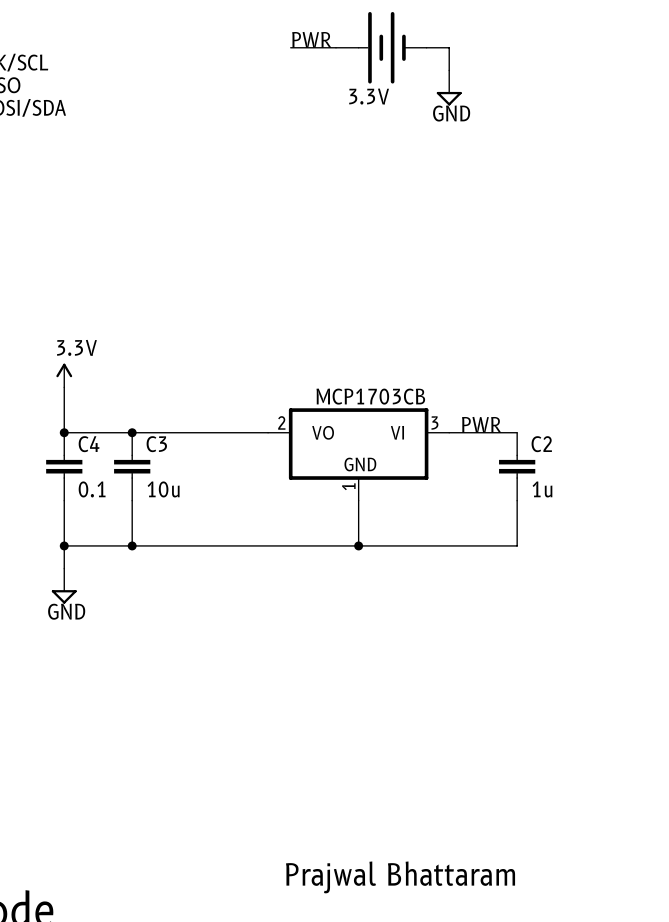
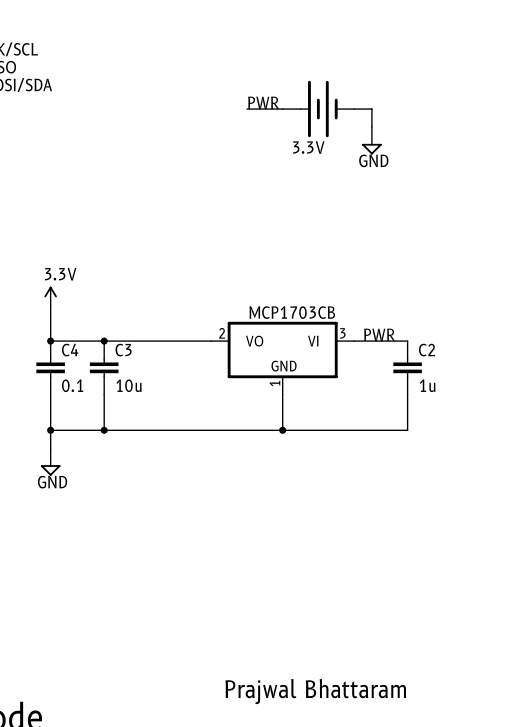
label position: PWR (311, 39) -> PWR (263, 102)
wire: (290, 47) (336, 47) -> (246, 109) (282, 109)
part position: (381, 47) -> (318, 109)
wire: (426, 47) (449, 47) (449, 70) -> (354, 109) (371, 109) (371, 126)
power symbol position: GND (449, 87) -> GND (371, 140)

